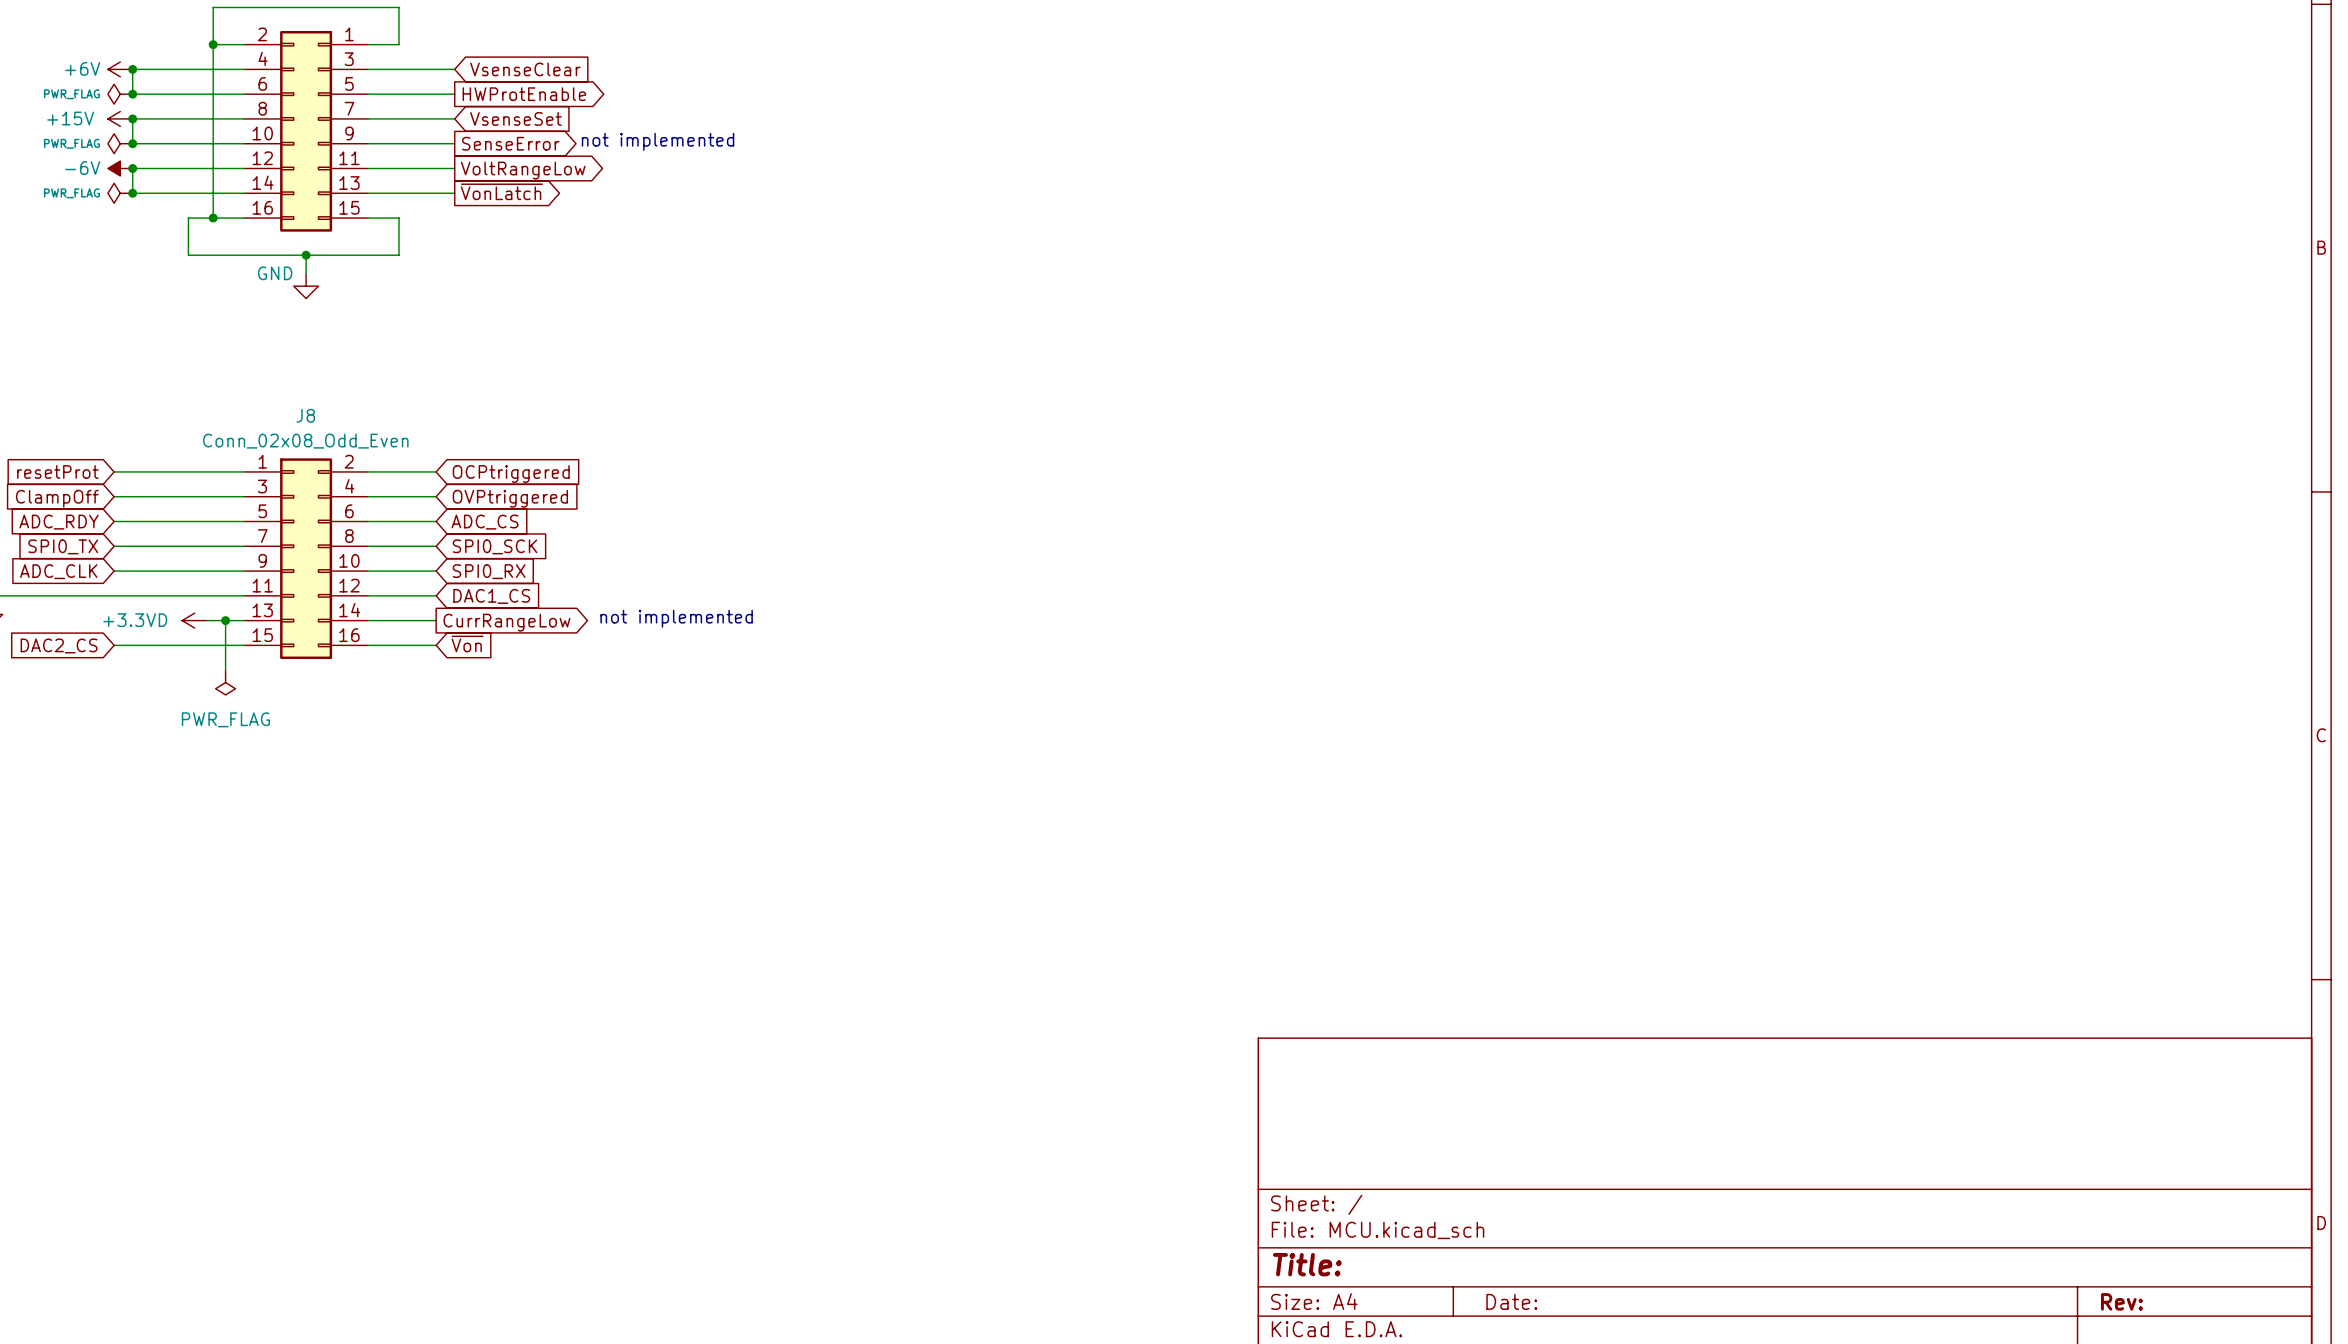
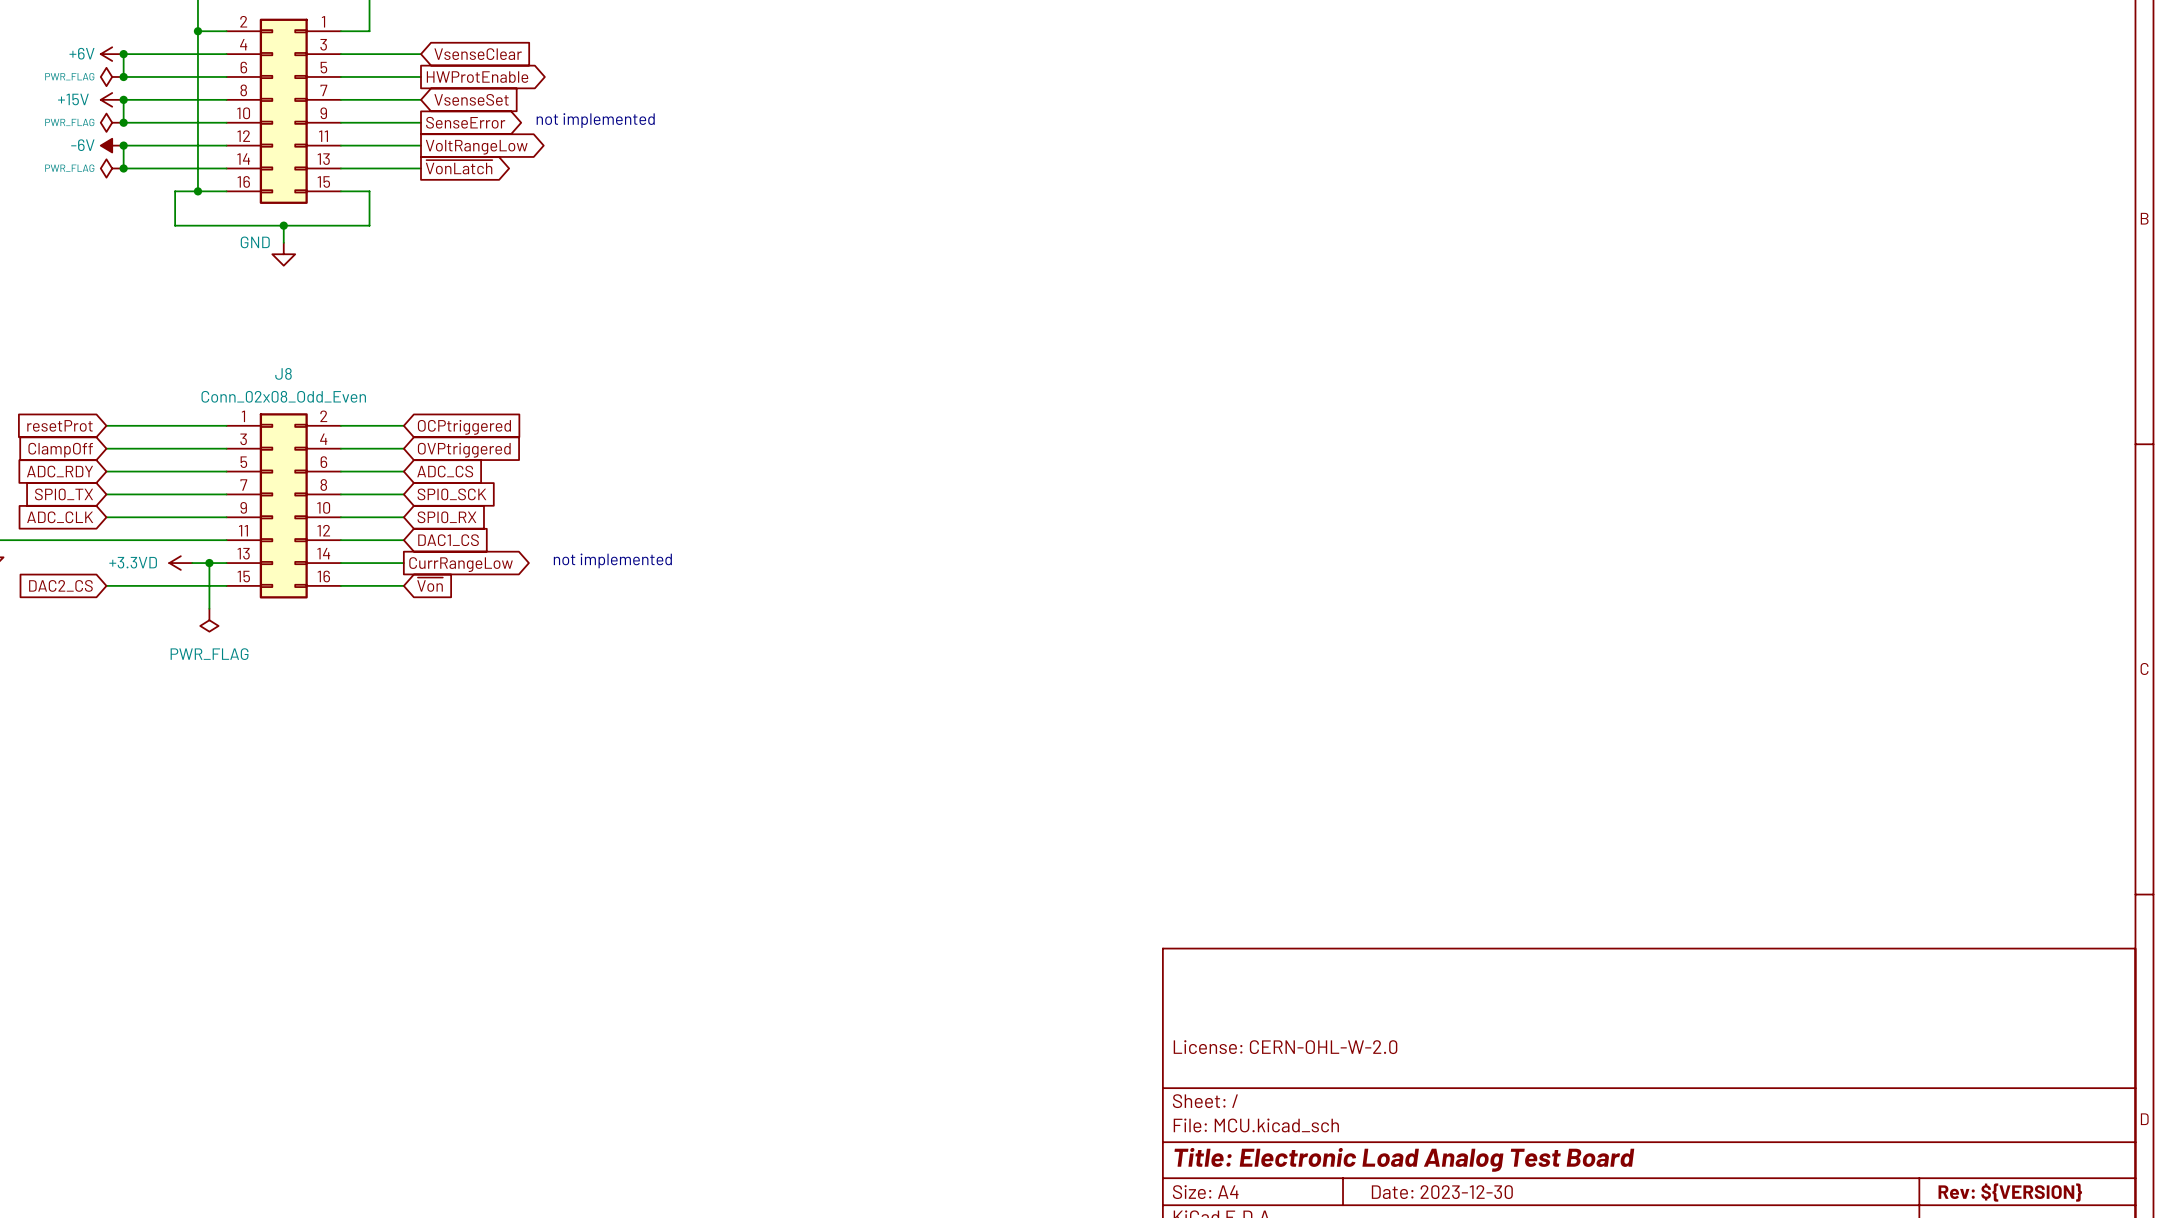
title block: none -> License: CERN-OHL-W-2.0 (1285, 1047)
title block: Title: (1307, 1264) -> Title: Electronic Load Analog Test Board (1404, 1159)
title block: Date: (1511, 1301) -> Date: 2023-12-30 (1442, 1192)
title block: Rev: (2121, 1301) -> Rev: ${VERSION} (2010, 1192)

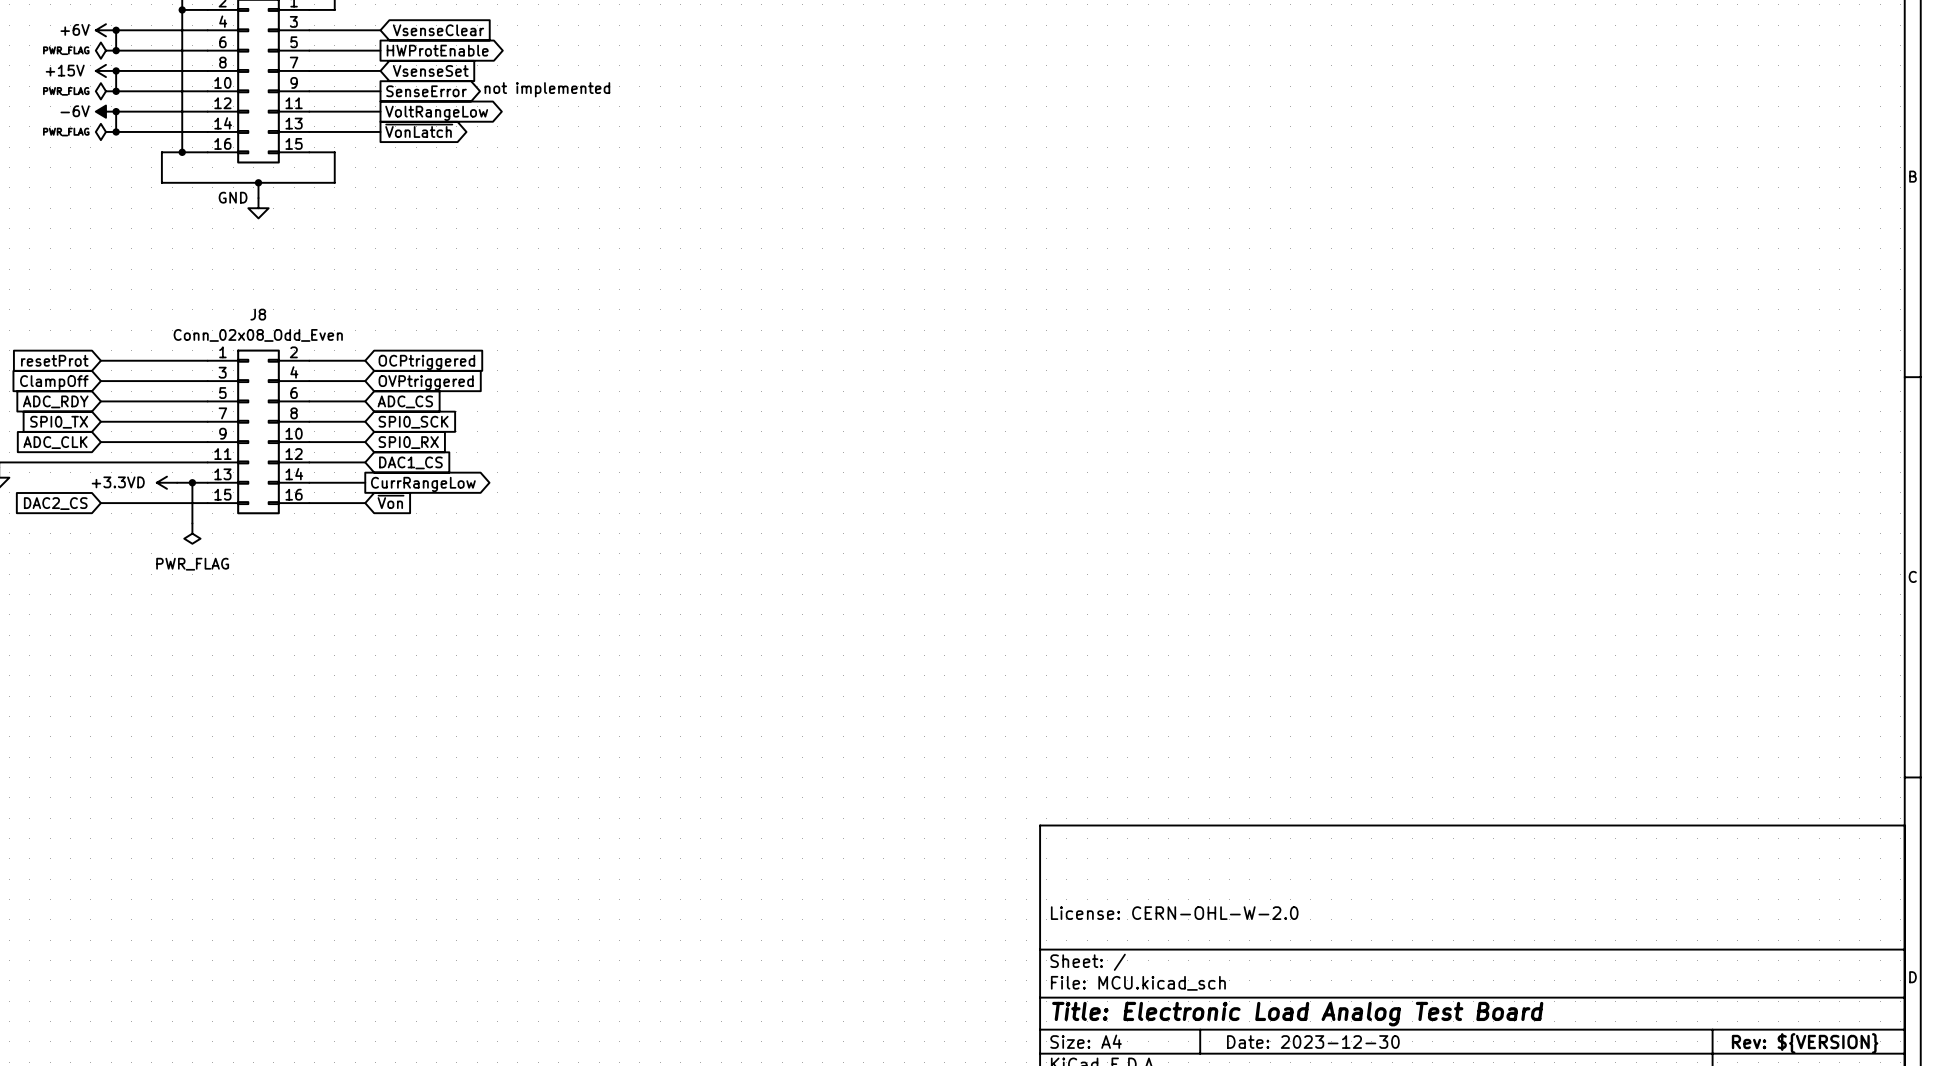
text: not implemented (612, 560) -> none

